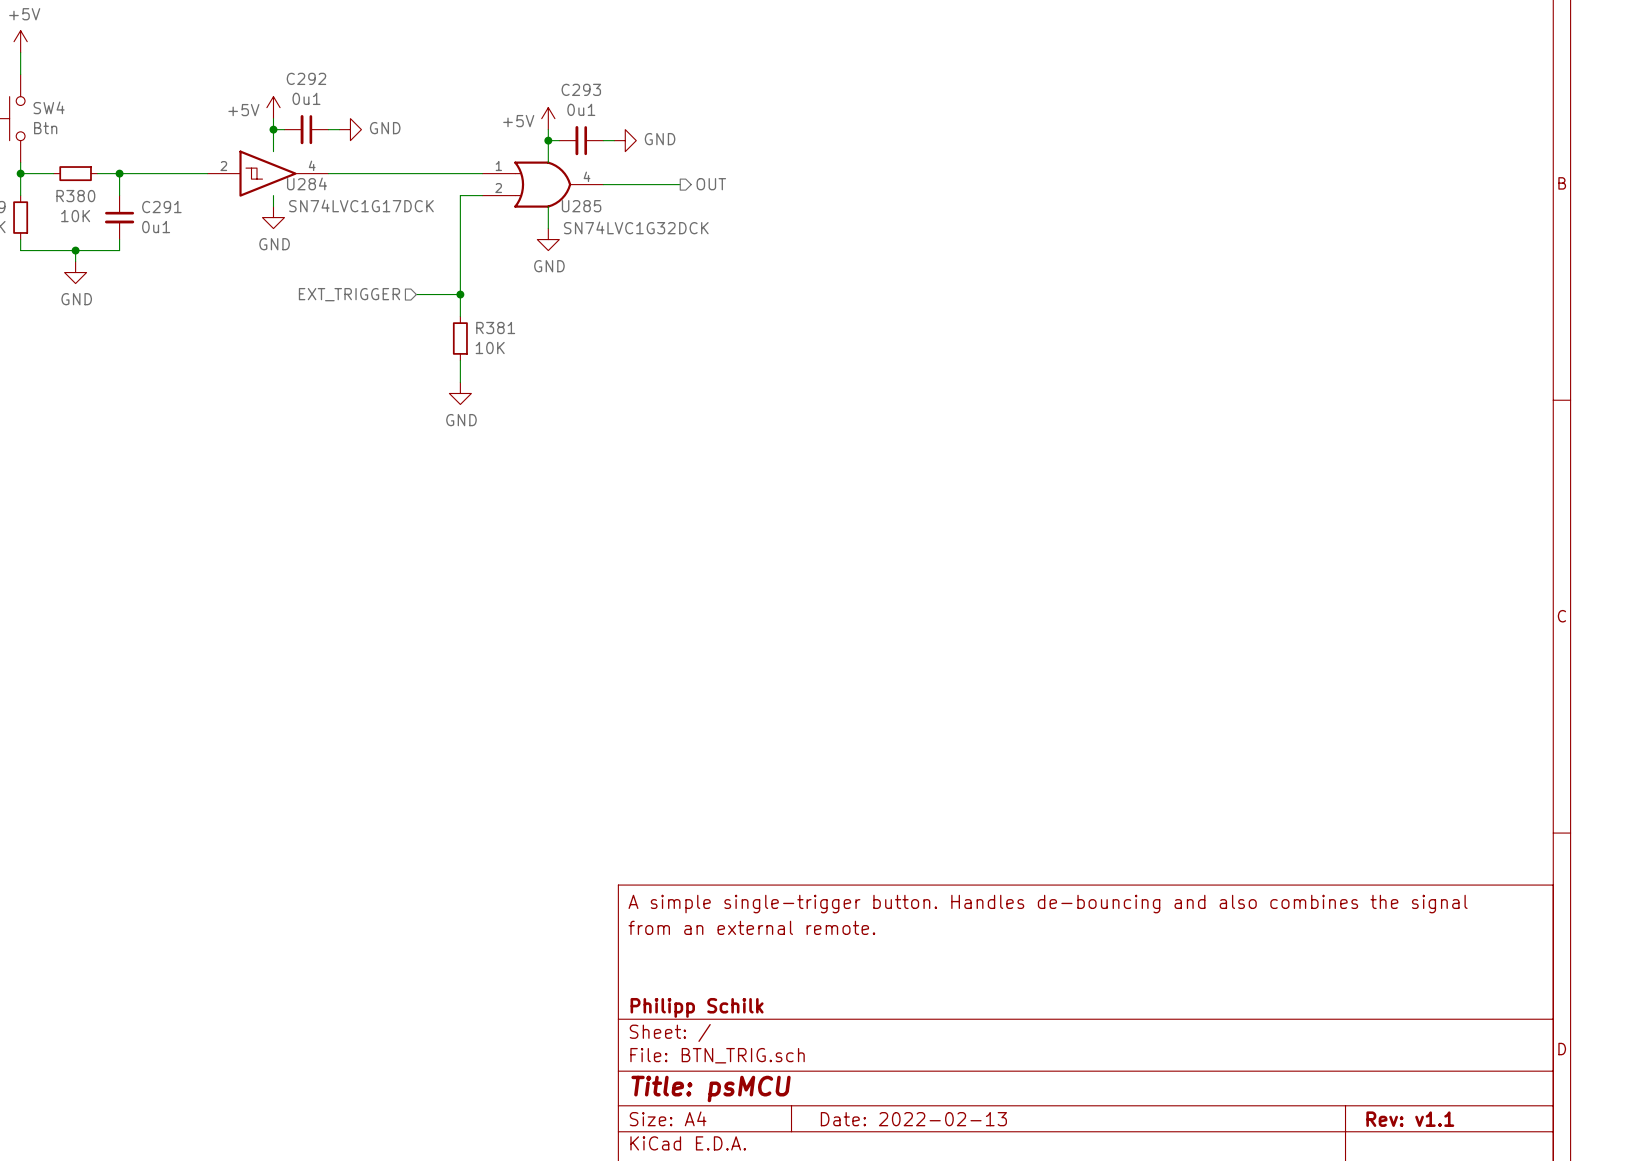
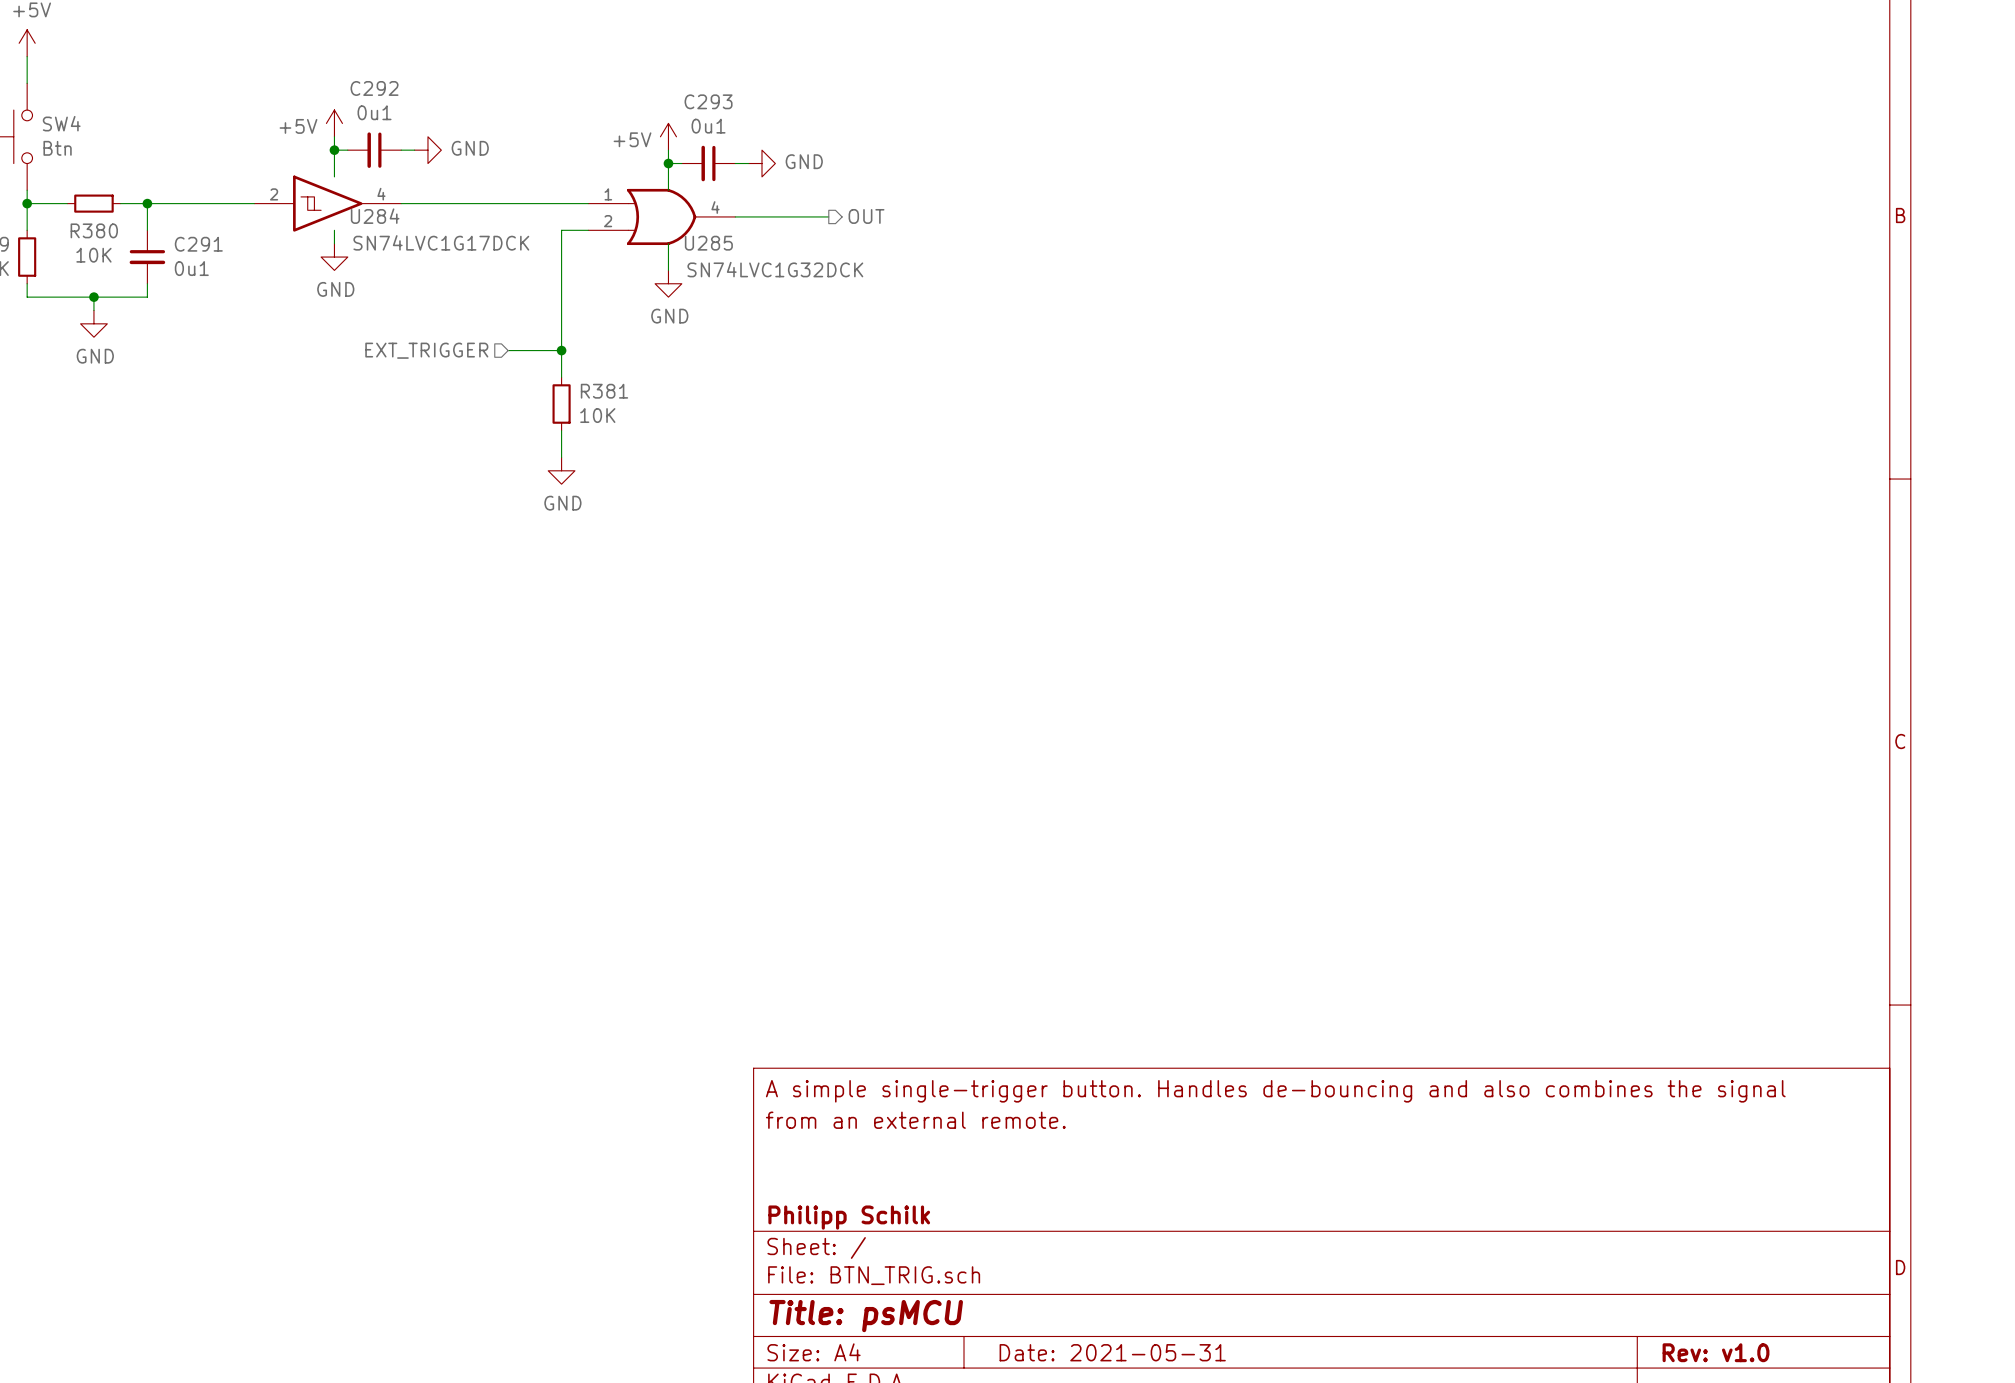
title block: Date: 2022-02-13 (913, 1119) -> Date: 2021-05-31 (1112, 1352)
title block: Rev: v1.1 (1410, 1119) -> Rev: v1.0 (1716, 1352)

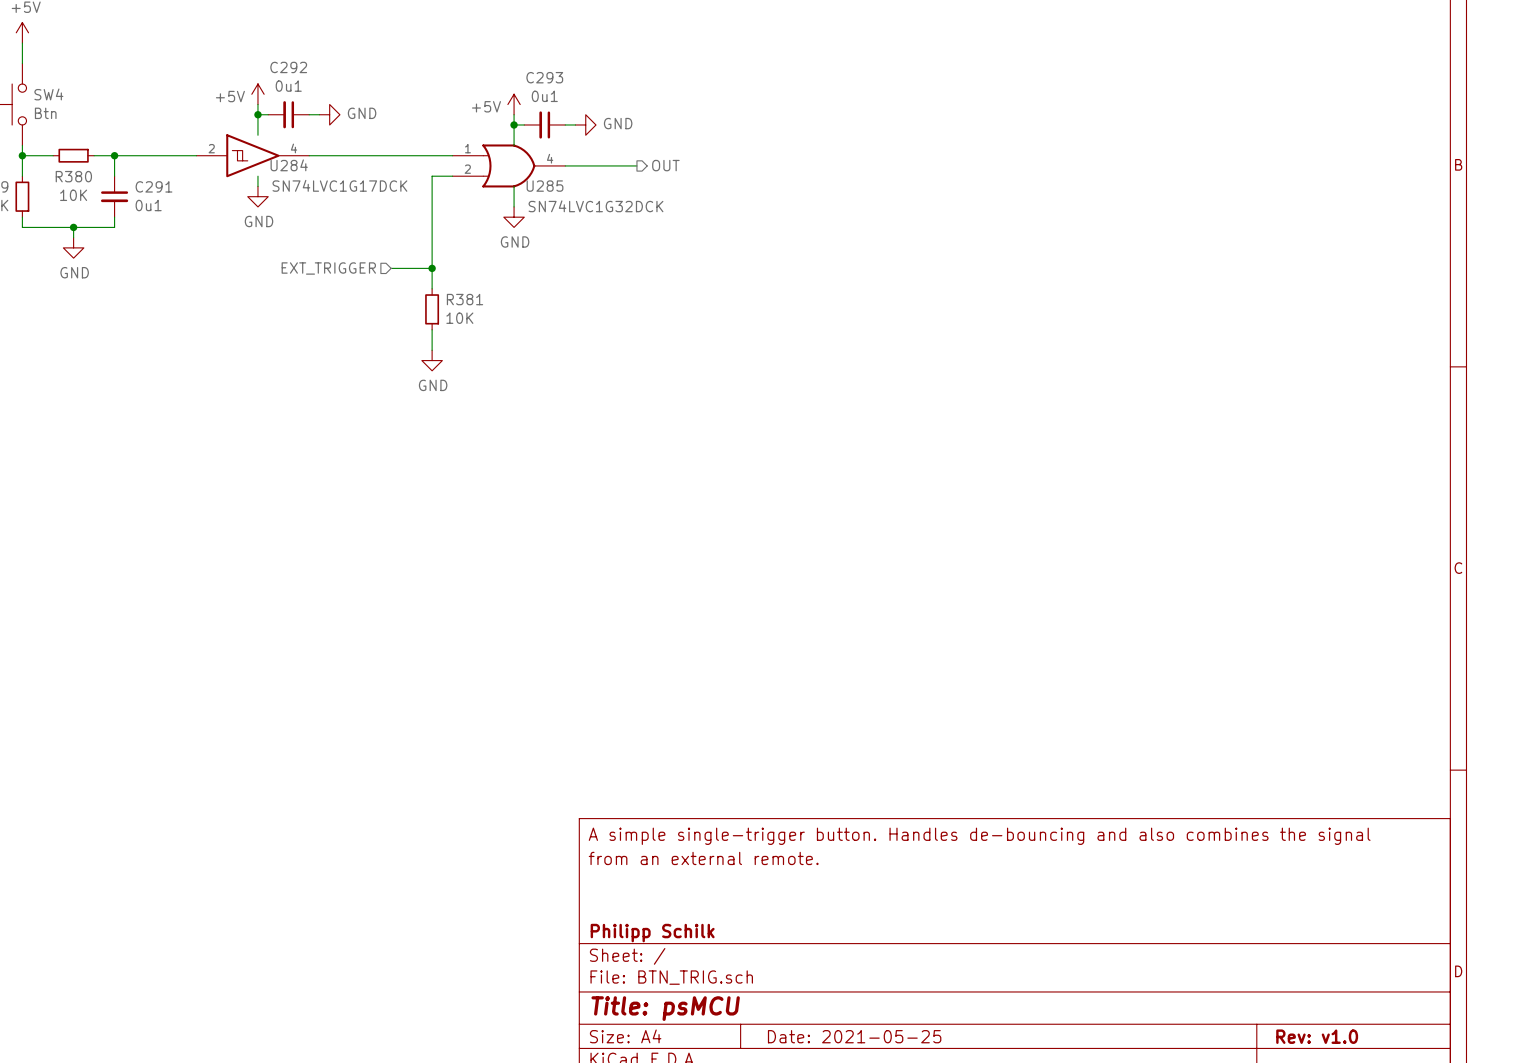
title block: Date: 2021-05-31 (1112, 1352) -> Date: 2021-05-25 (854, 1036)

